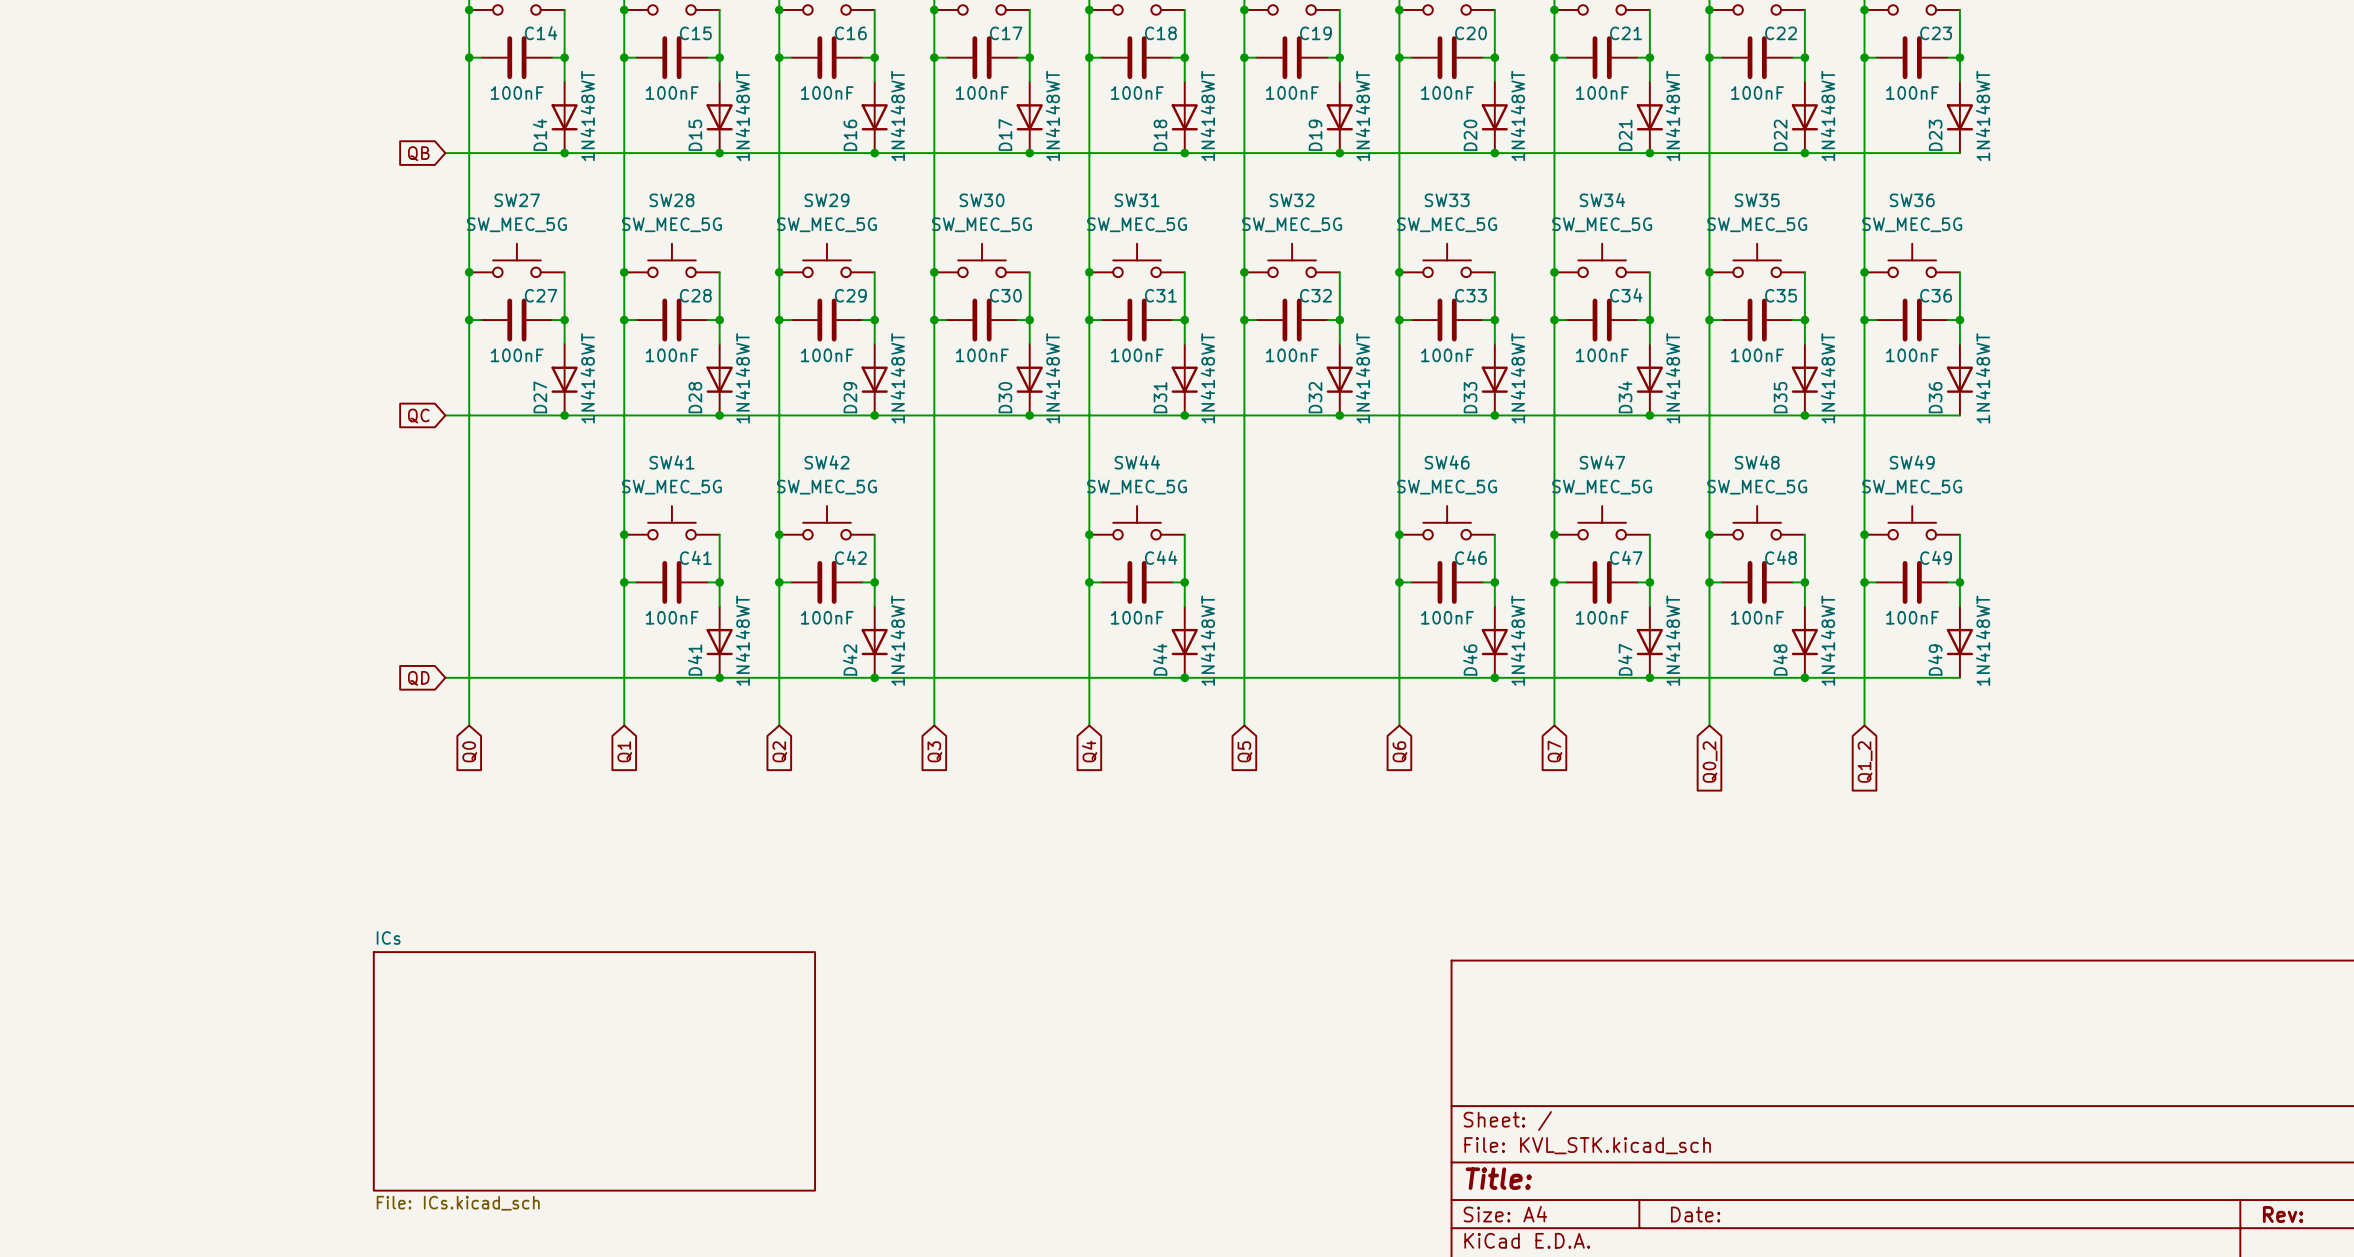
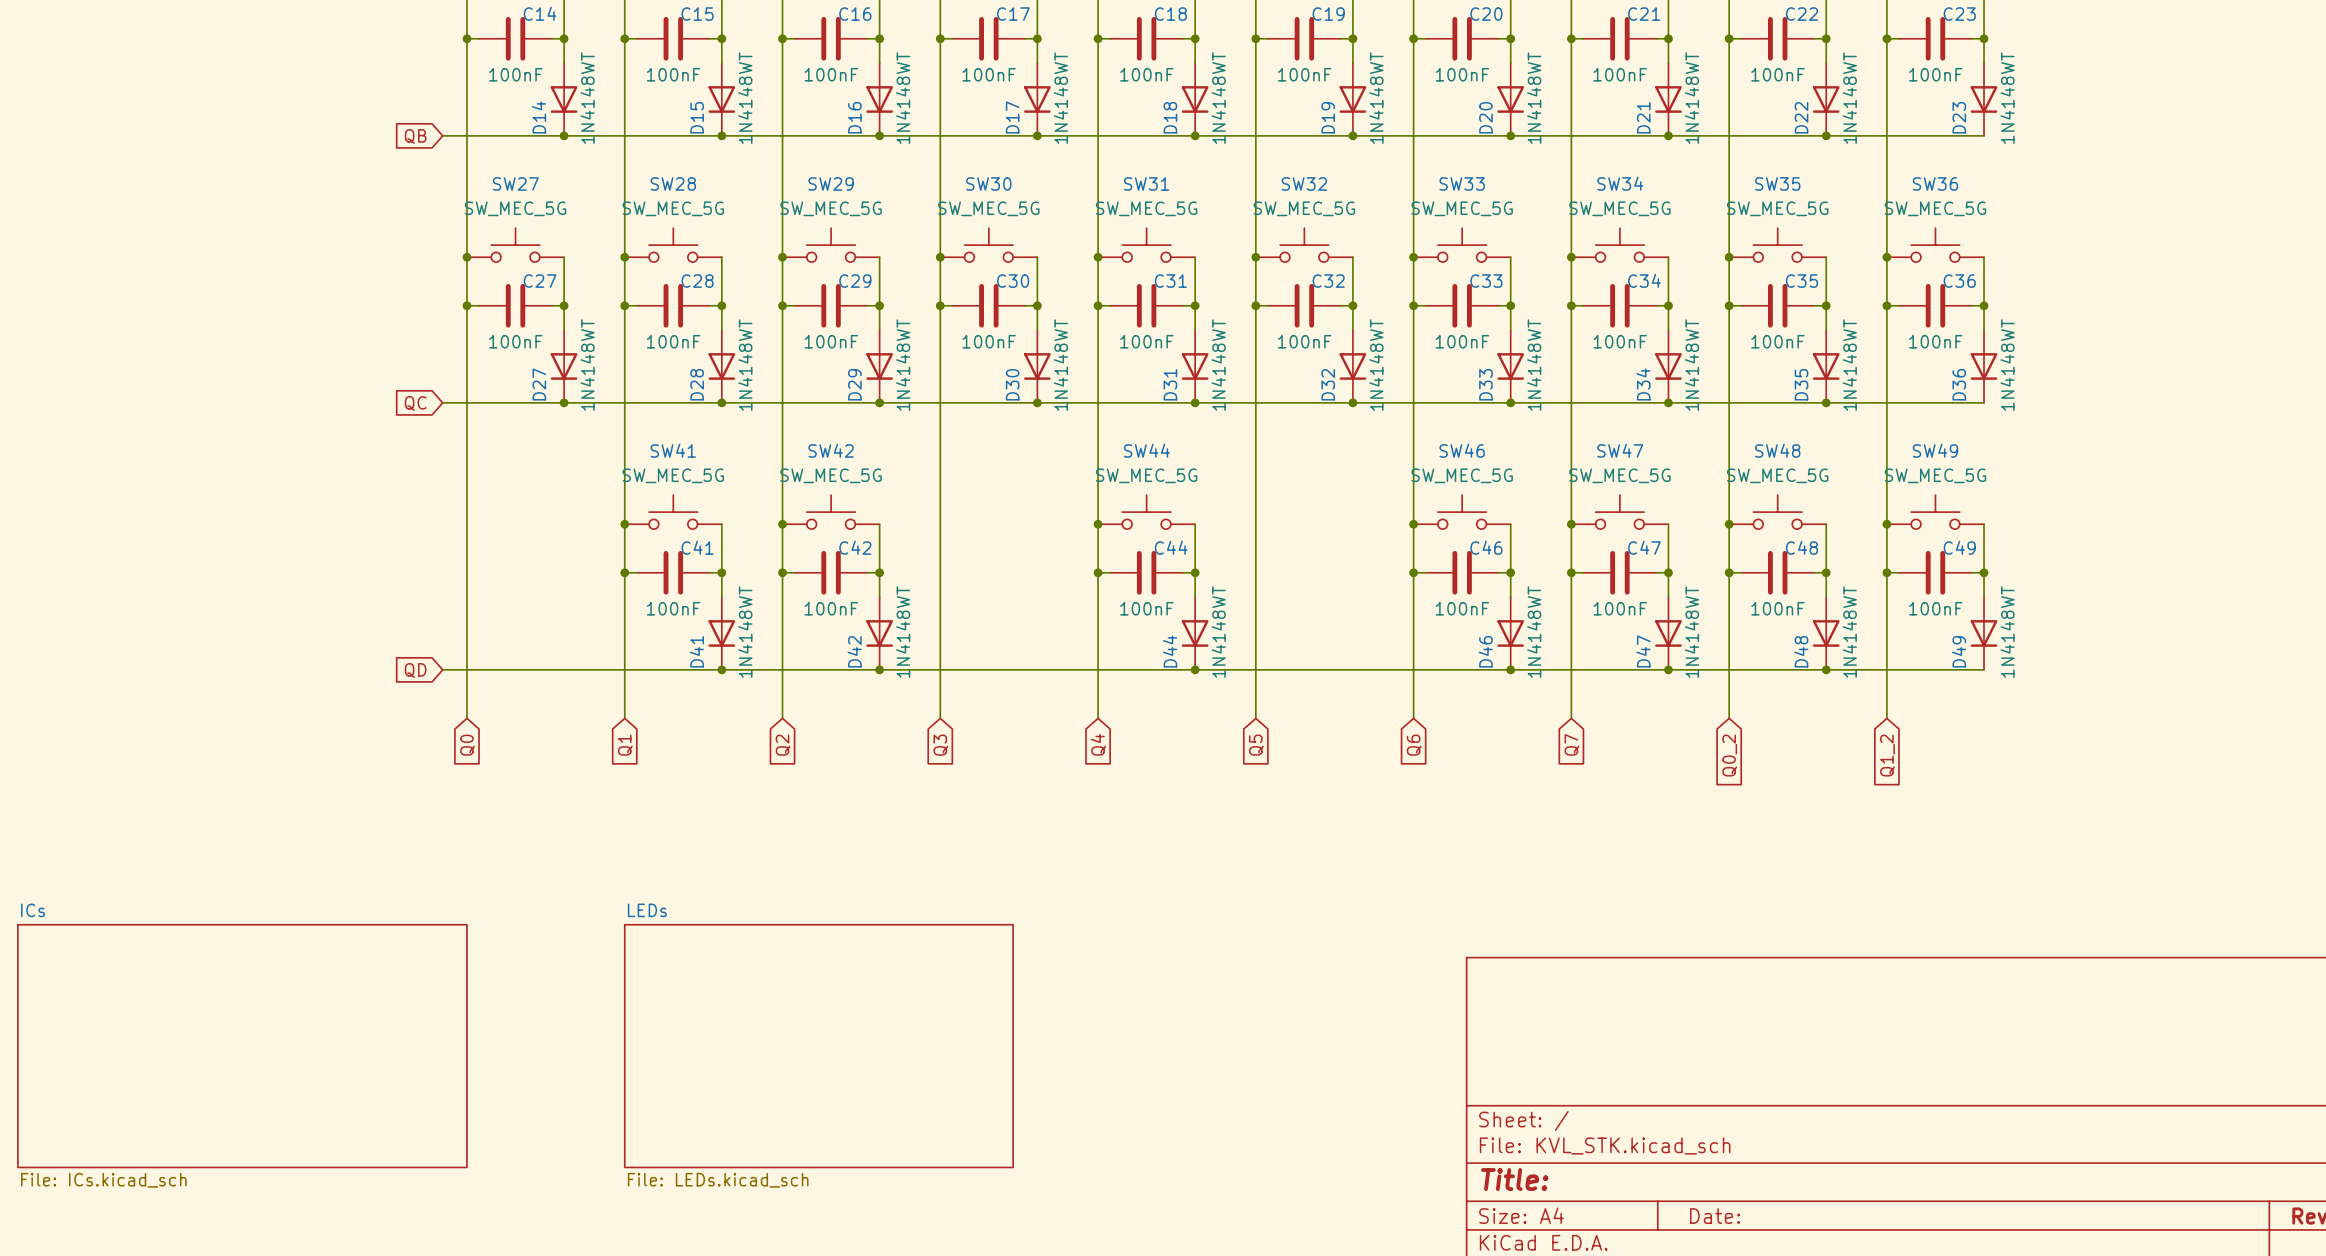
sheet ICs: none -> File: ICs.kicad_sch (242, 1046)
sheet LEDs: none -> File: LEDs.kicad_sch (818, 1046)
sheet ICs: File: ICs.kicad_sch (594, 1071) -> none

